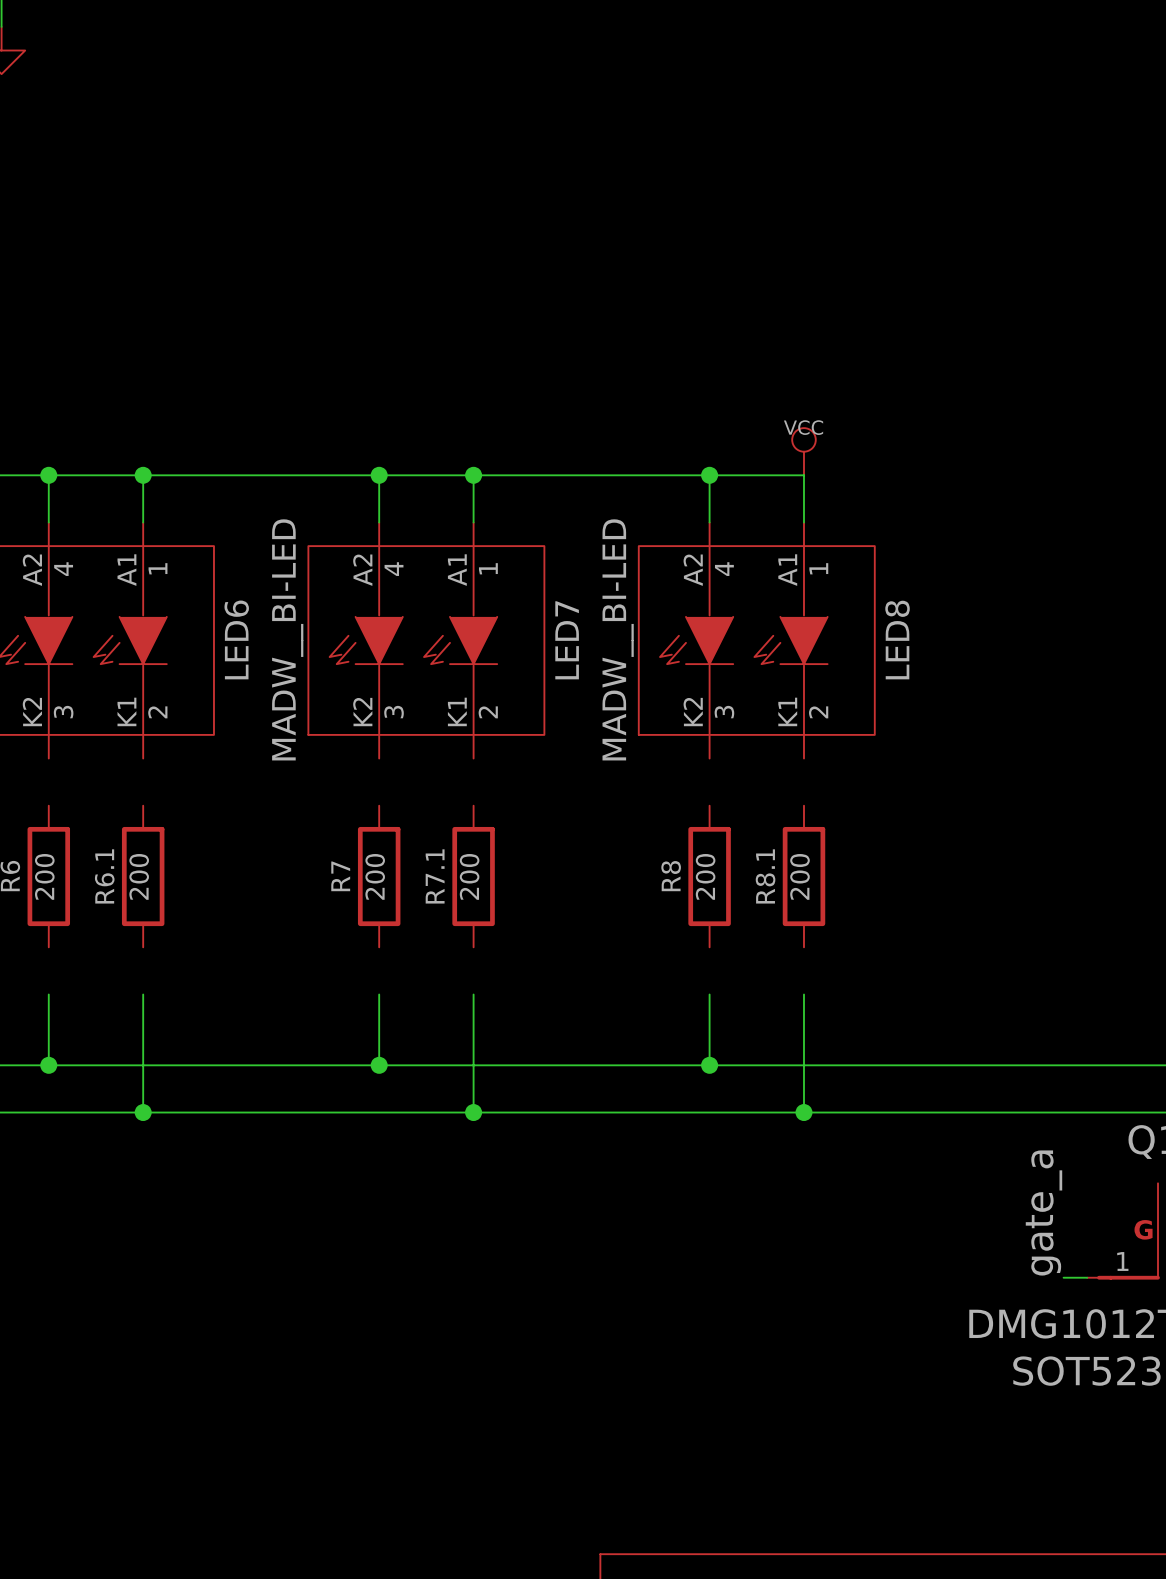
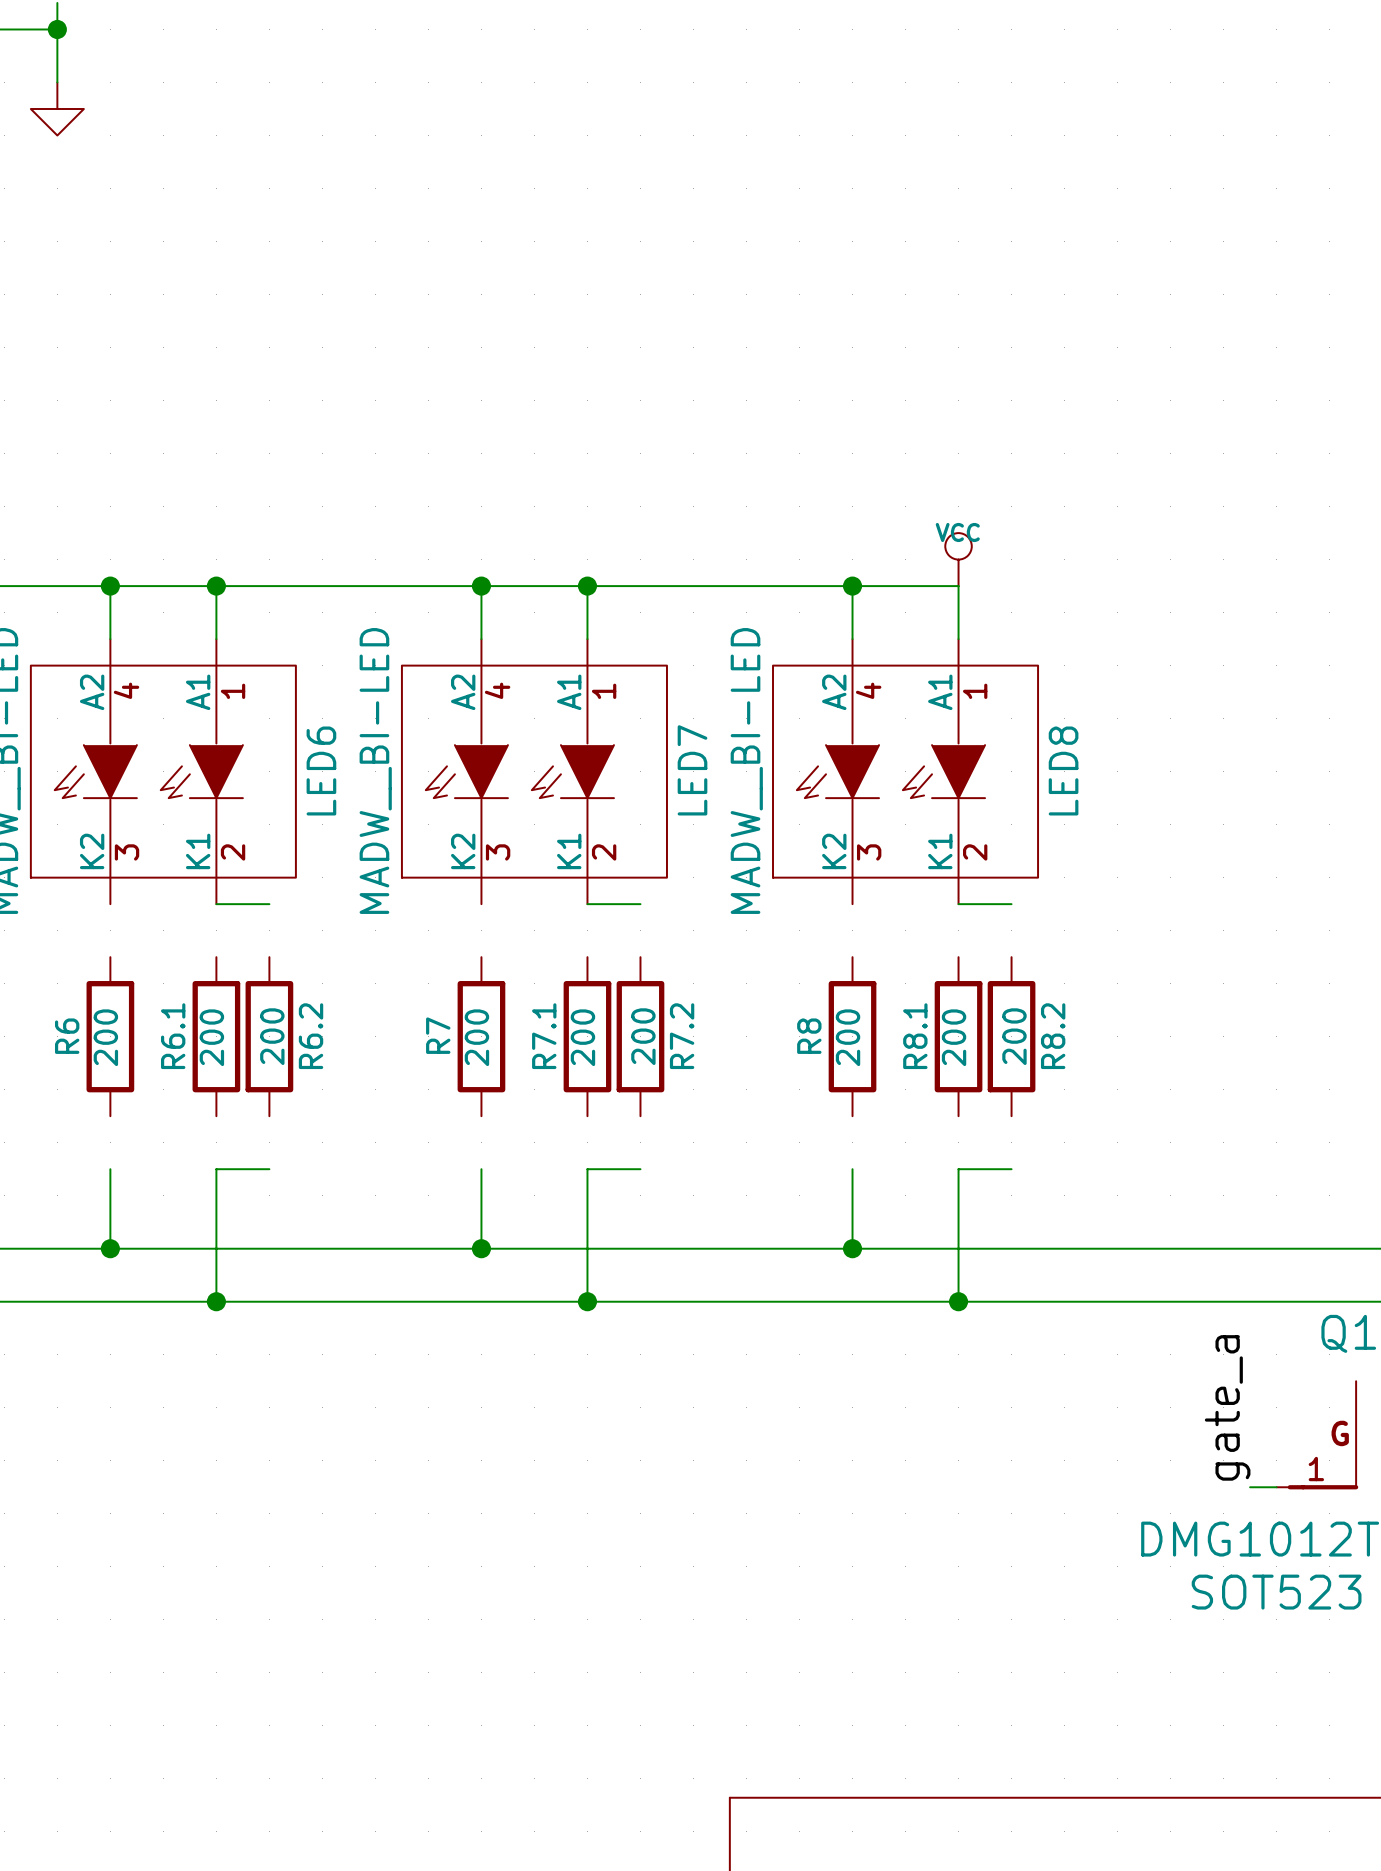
wire: none -> (216, 904) (269, 904)
wire: none -> (587, 904) (640, 904)
wire: none -> (958, 904) (1011, 904)
R6.2: none -> 200 (269, 1036)
R7.2: none -> 200 (640, 1036)
R8.2: none -> 200 (1011, 1036)
wire: none -> (216, 1169) (269, 1169)
wire: none -> (587, 1169) (640, 1169)
wire: none -> (958, 1169) (1011, 1169)

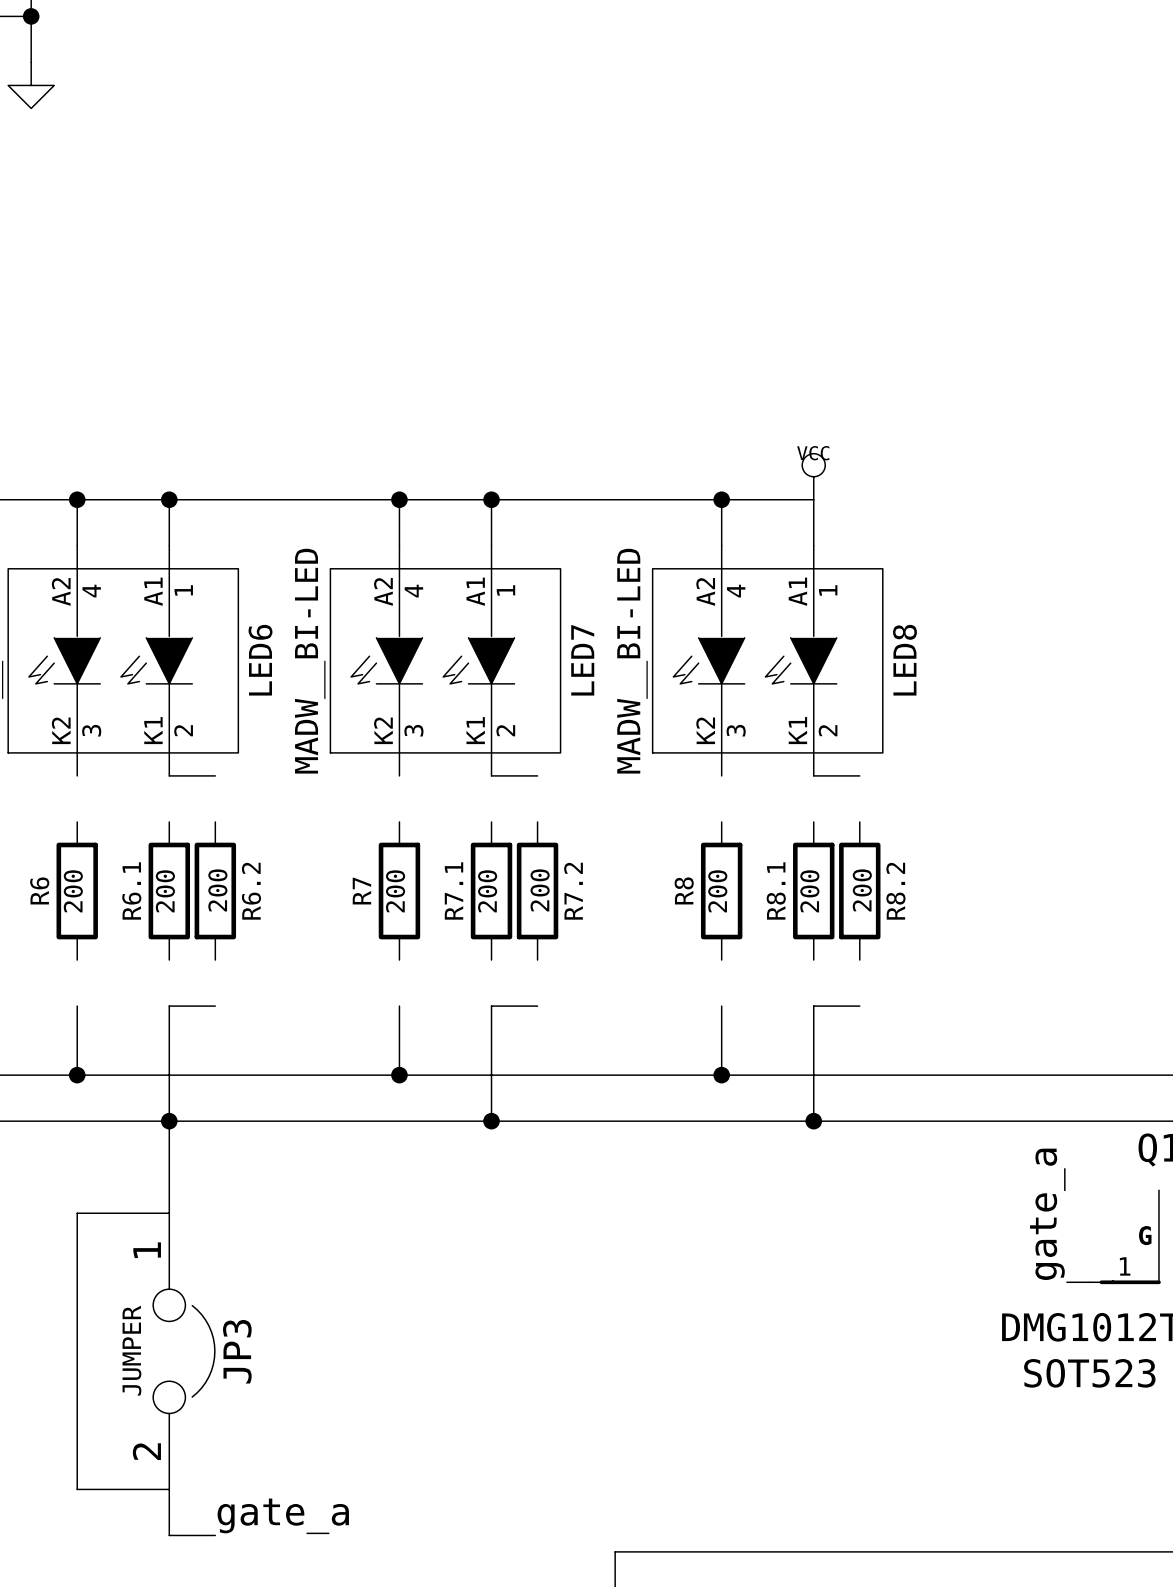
wire: none -> (169, 1121) (169, 1213) (77, 1213) (77, 1489) (169, 1489) (169, 1535) (215, 1535)
JP3: none -> JUMPER (184, 1351)
label: none -> gate_a (283, 1516)

